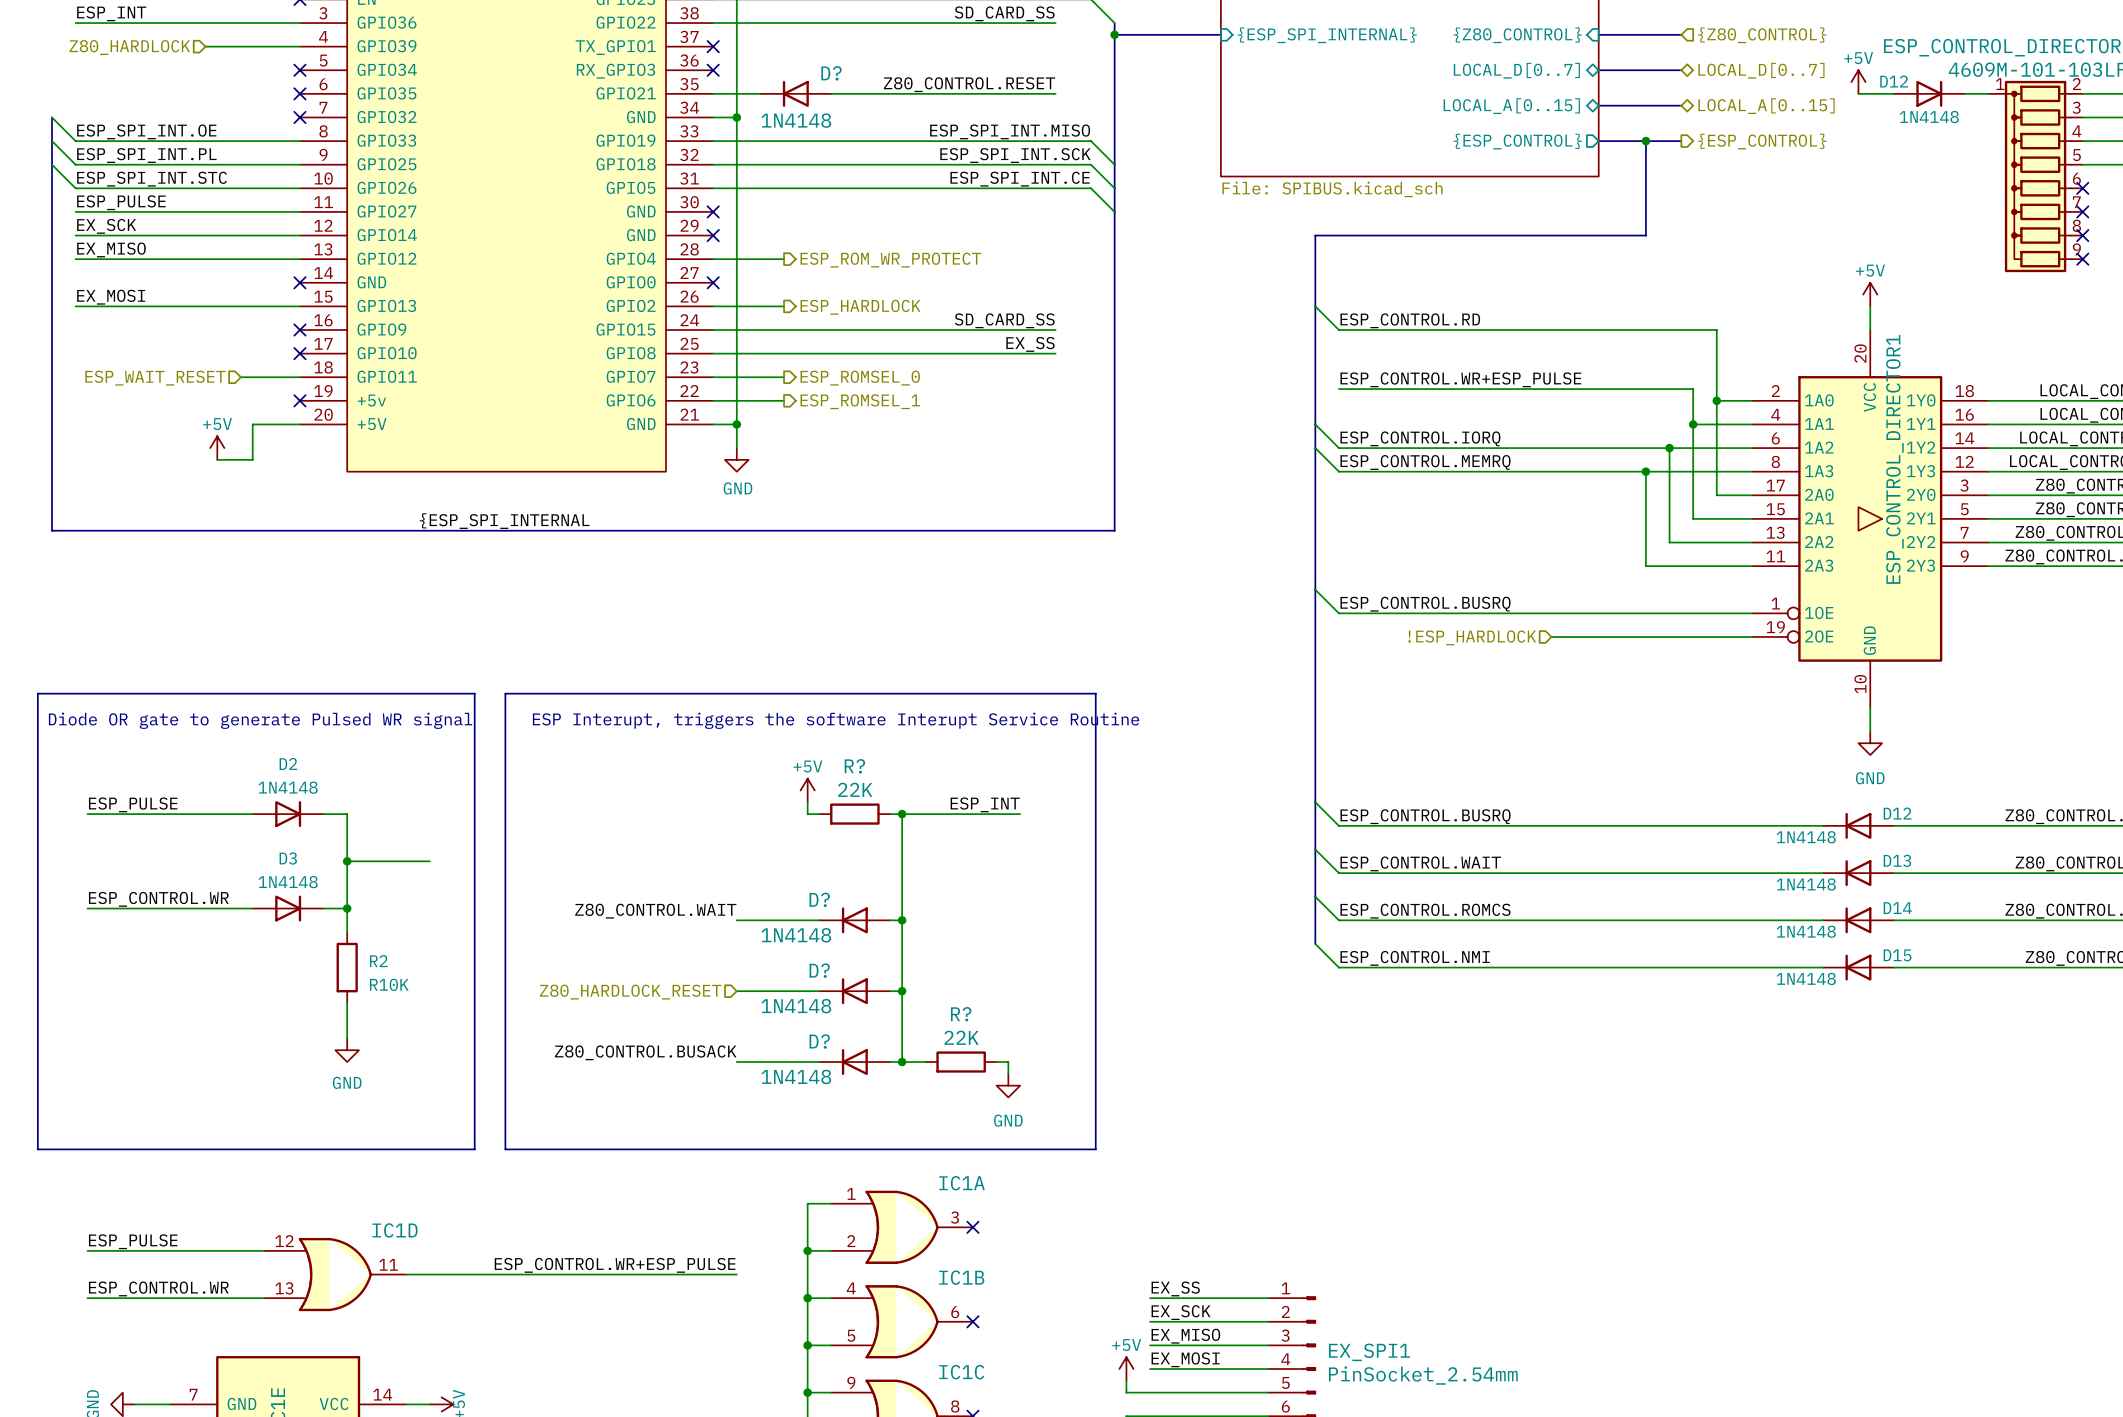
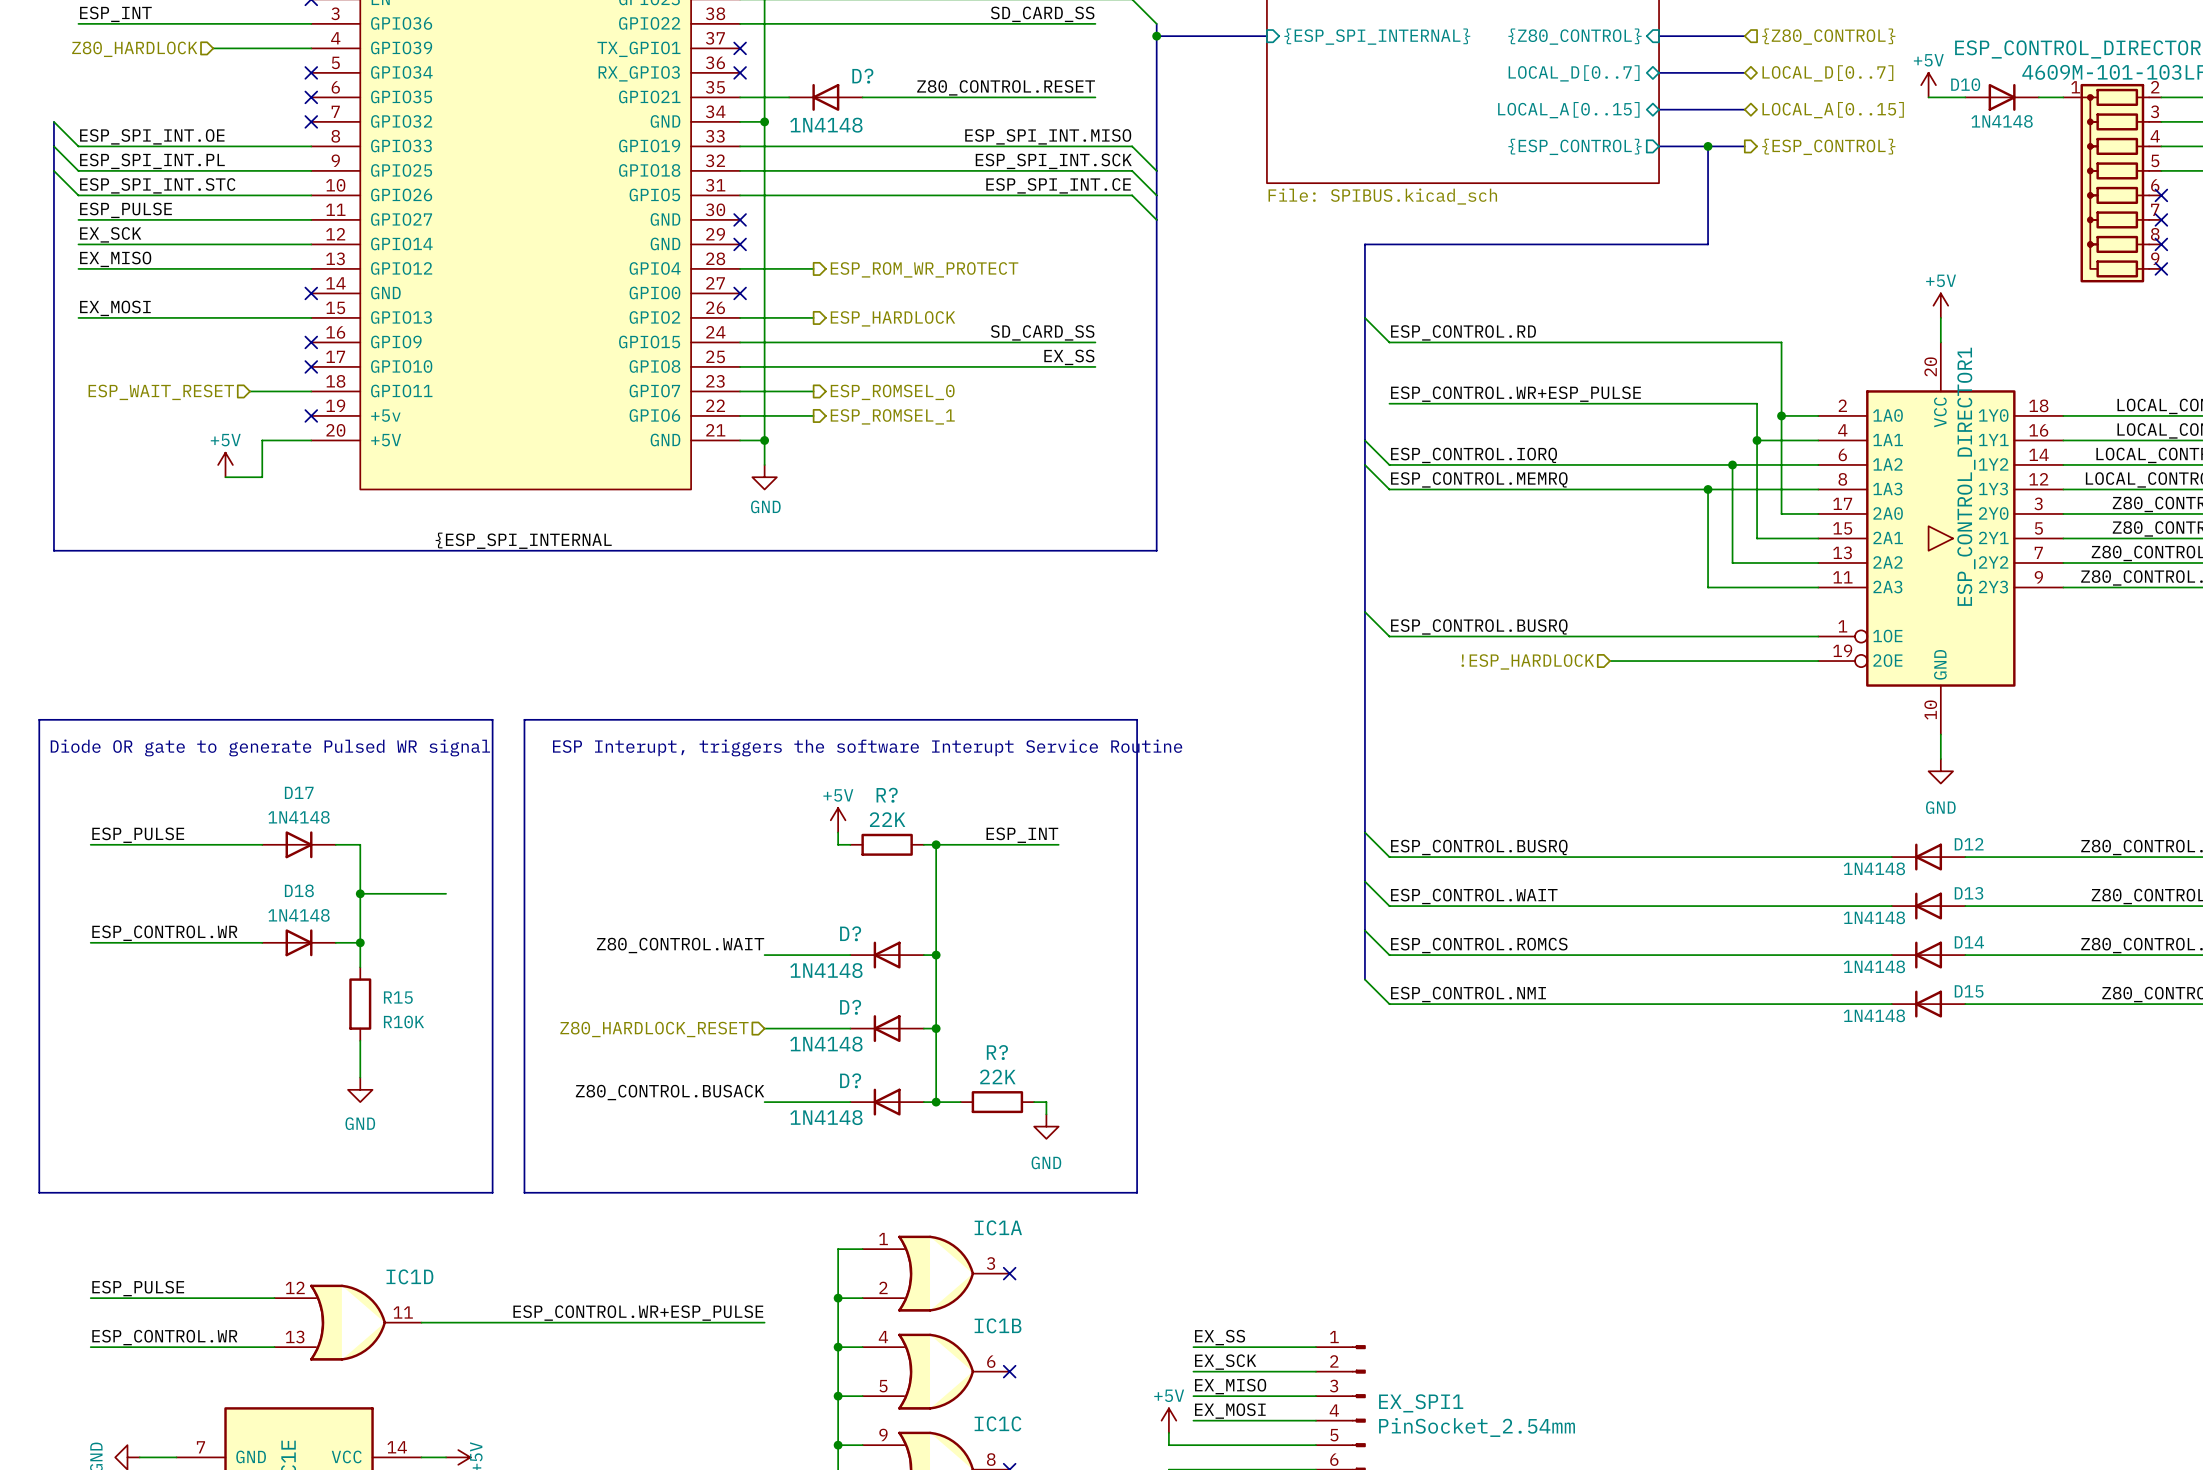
D12 name: D12 (1894, 81) -> D10 (1965, 84)
D2 name: D2 (288, 763) -> D17 (299, 792)
D3 name: D3 (288, 858) -> D18 (299, 890)
R2 name: R2 (378, 961) -> R15 (398, 997)

